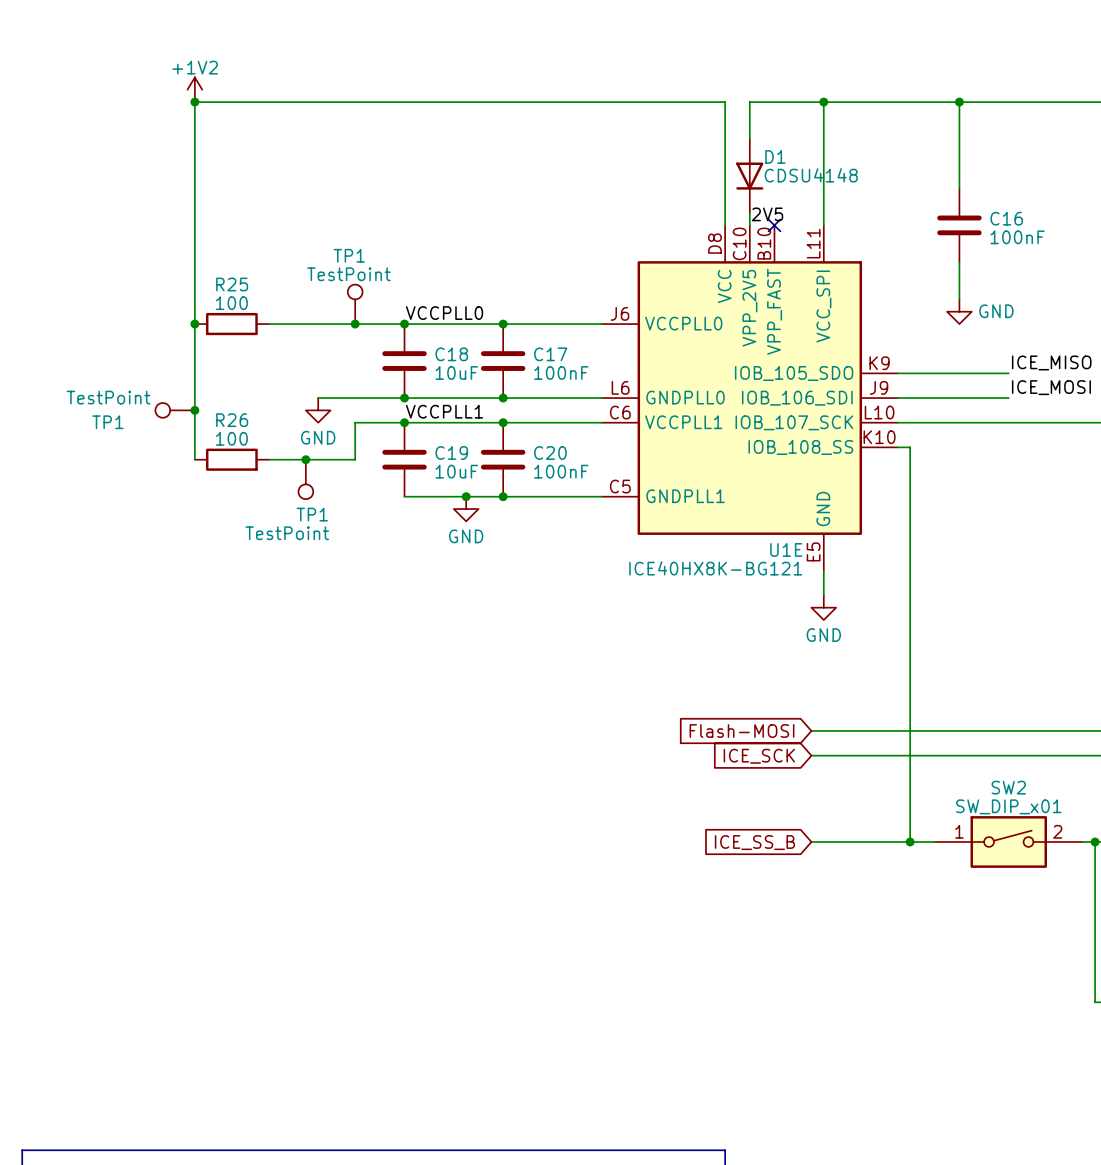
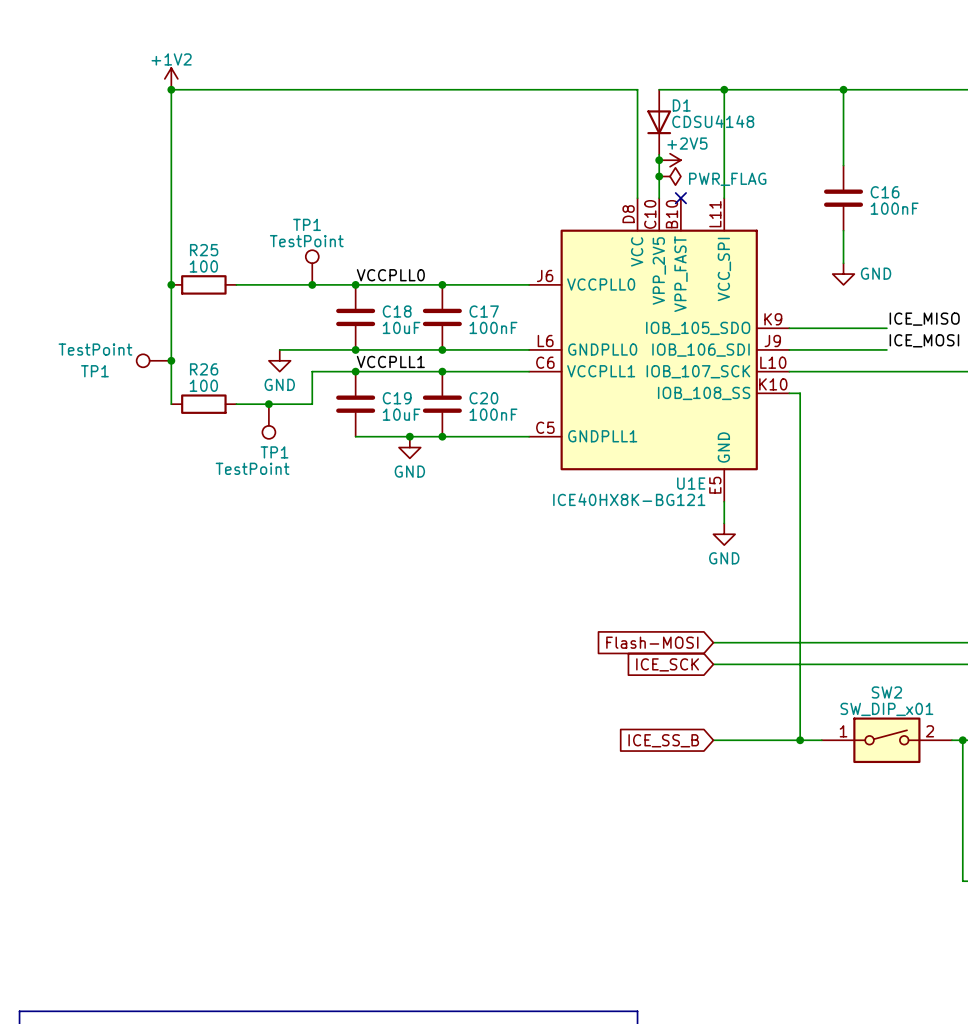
D1 position: (749, 176) -> (659, 122)
junction: none -> (659, 160)
power symbol: none -> +2V5 (670, 160)
junction: none -> (659, 176)
power symbol: none -> PWR_FLAG (670, 176)
label: 2V5 (767, 214) -> none

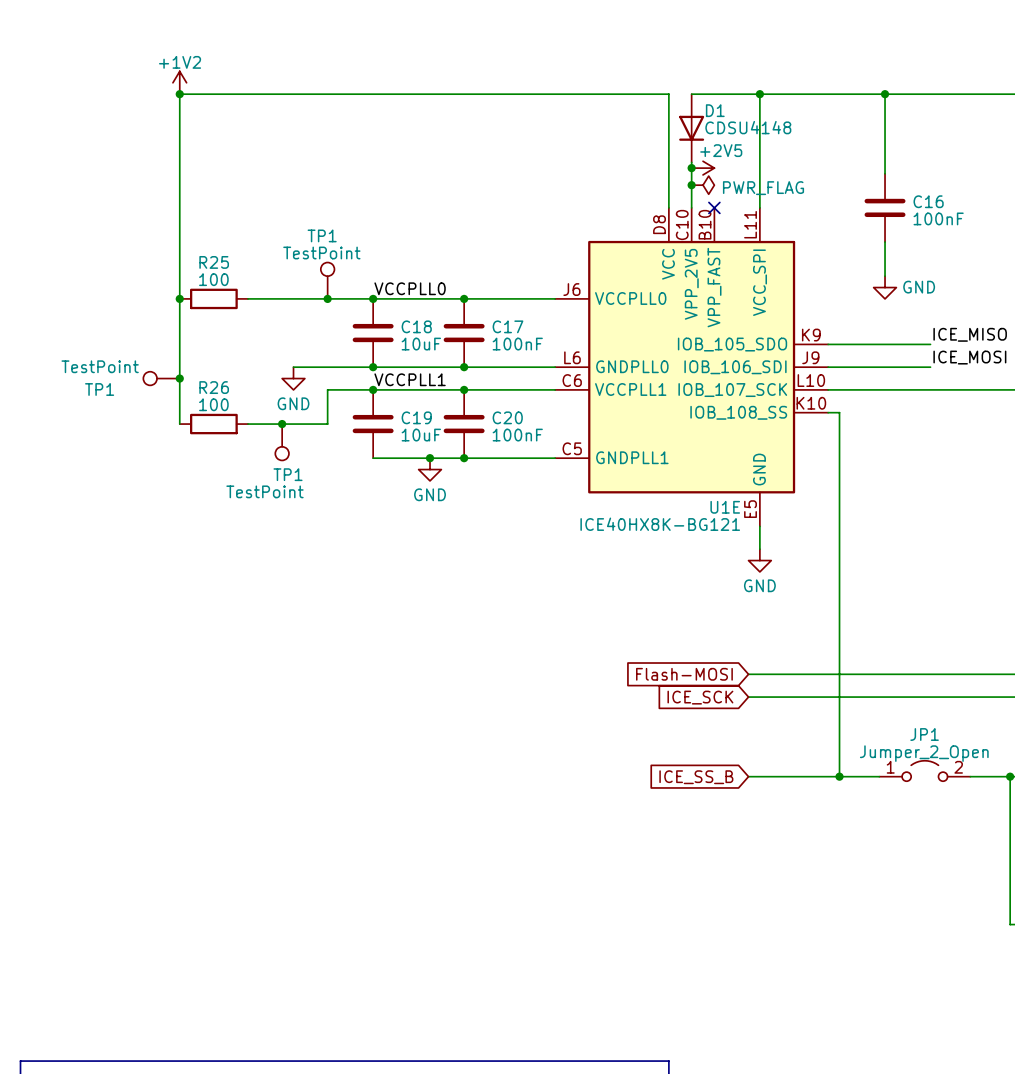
JP1: none -> Jumper_2_Open (924, 770)
SW2: SW_DIP_x01 (886, 740) -> none

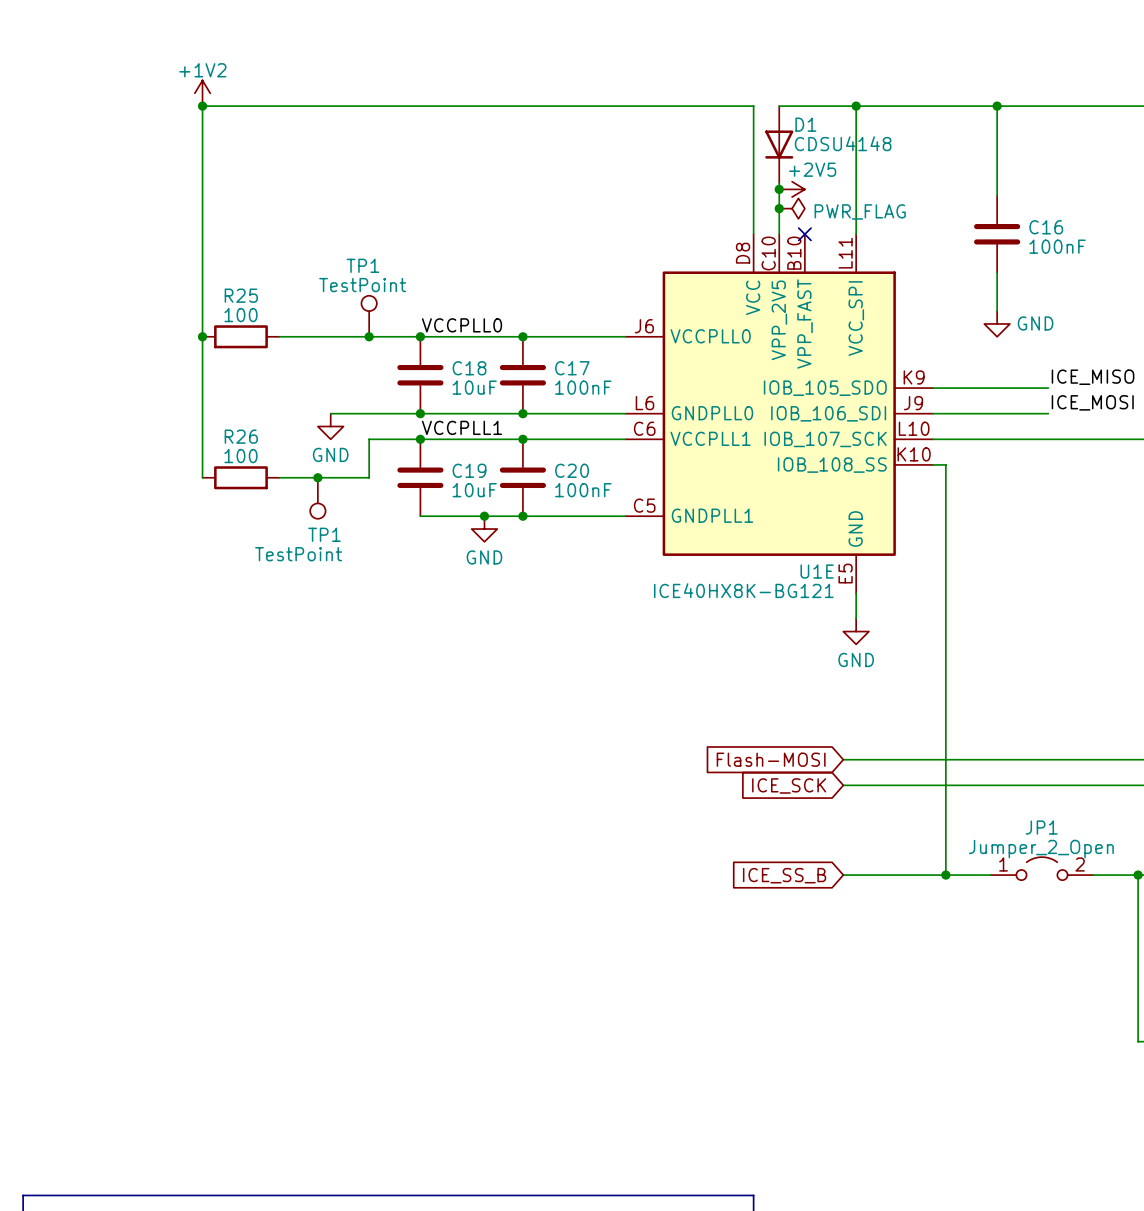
TP1: TestPoint (161, 378) -> none
junction: (179, 378) -> none

